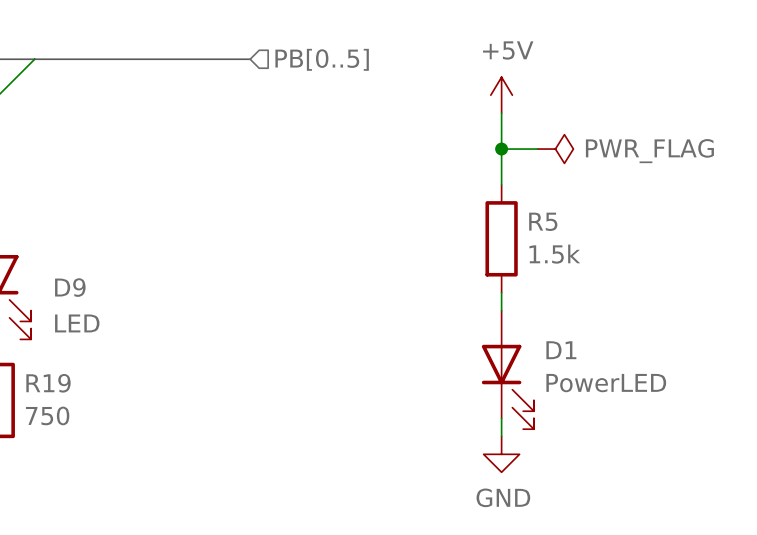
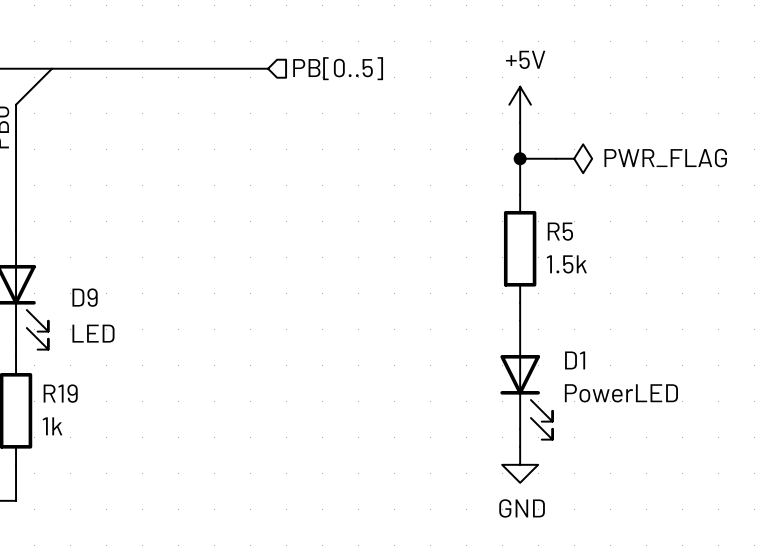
R19 value: 750 (47, 415) -> 1k (52, 426)

